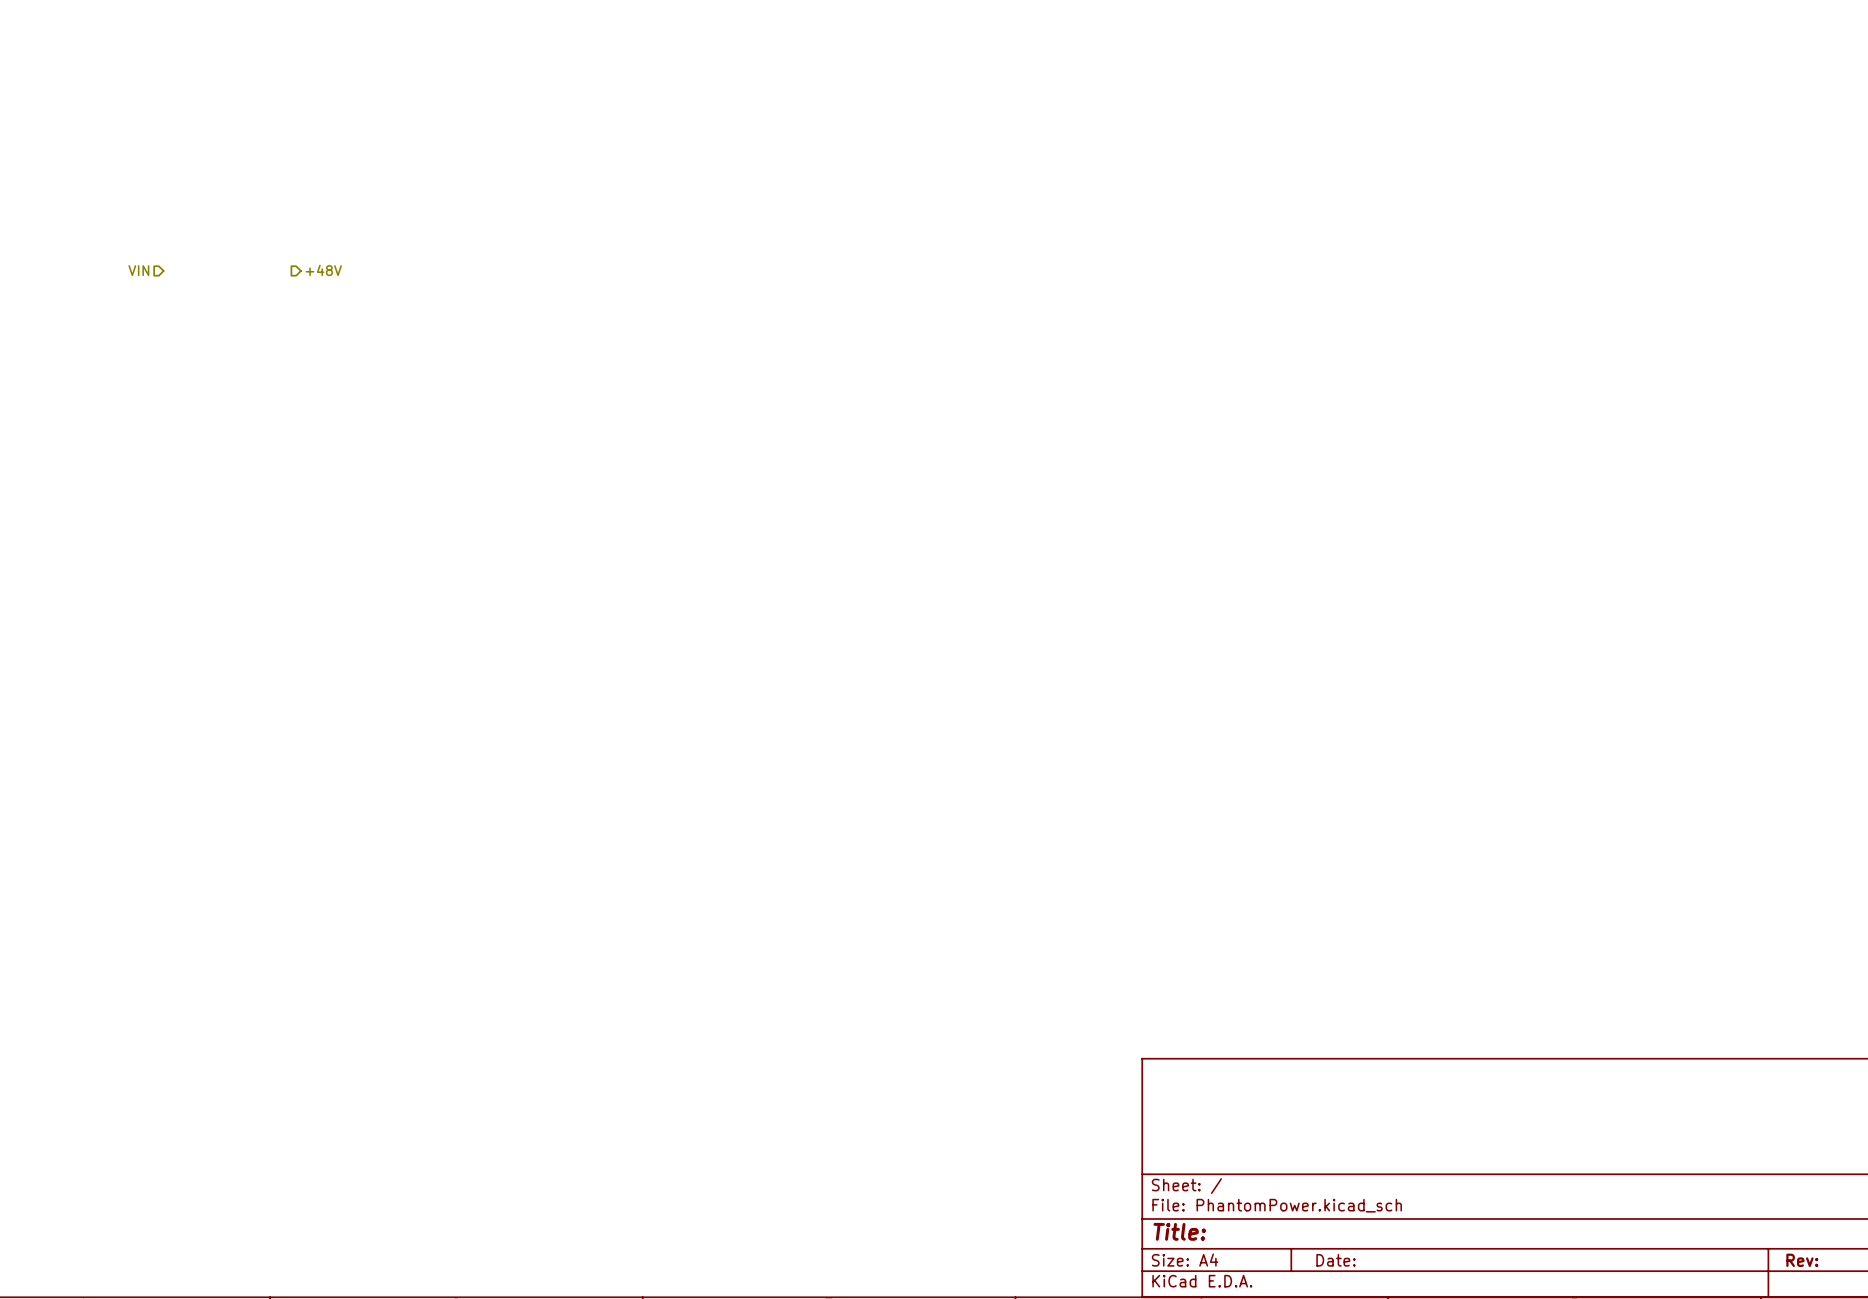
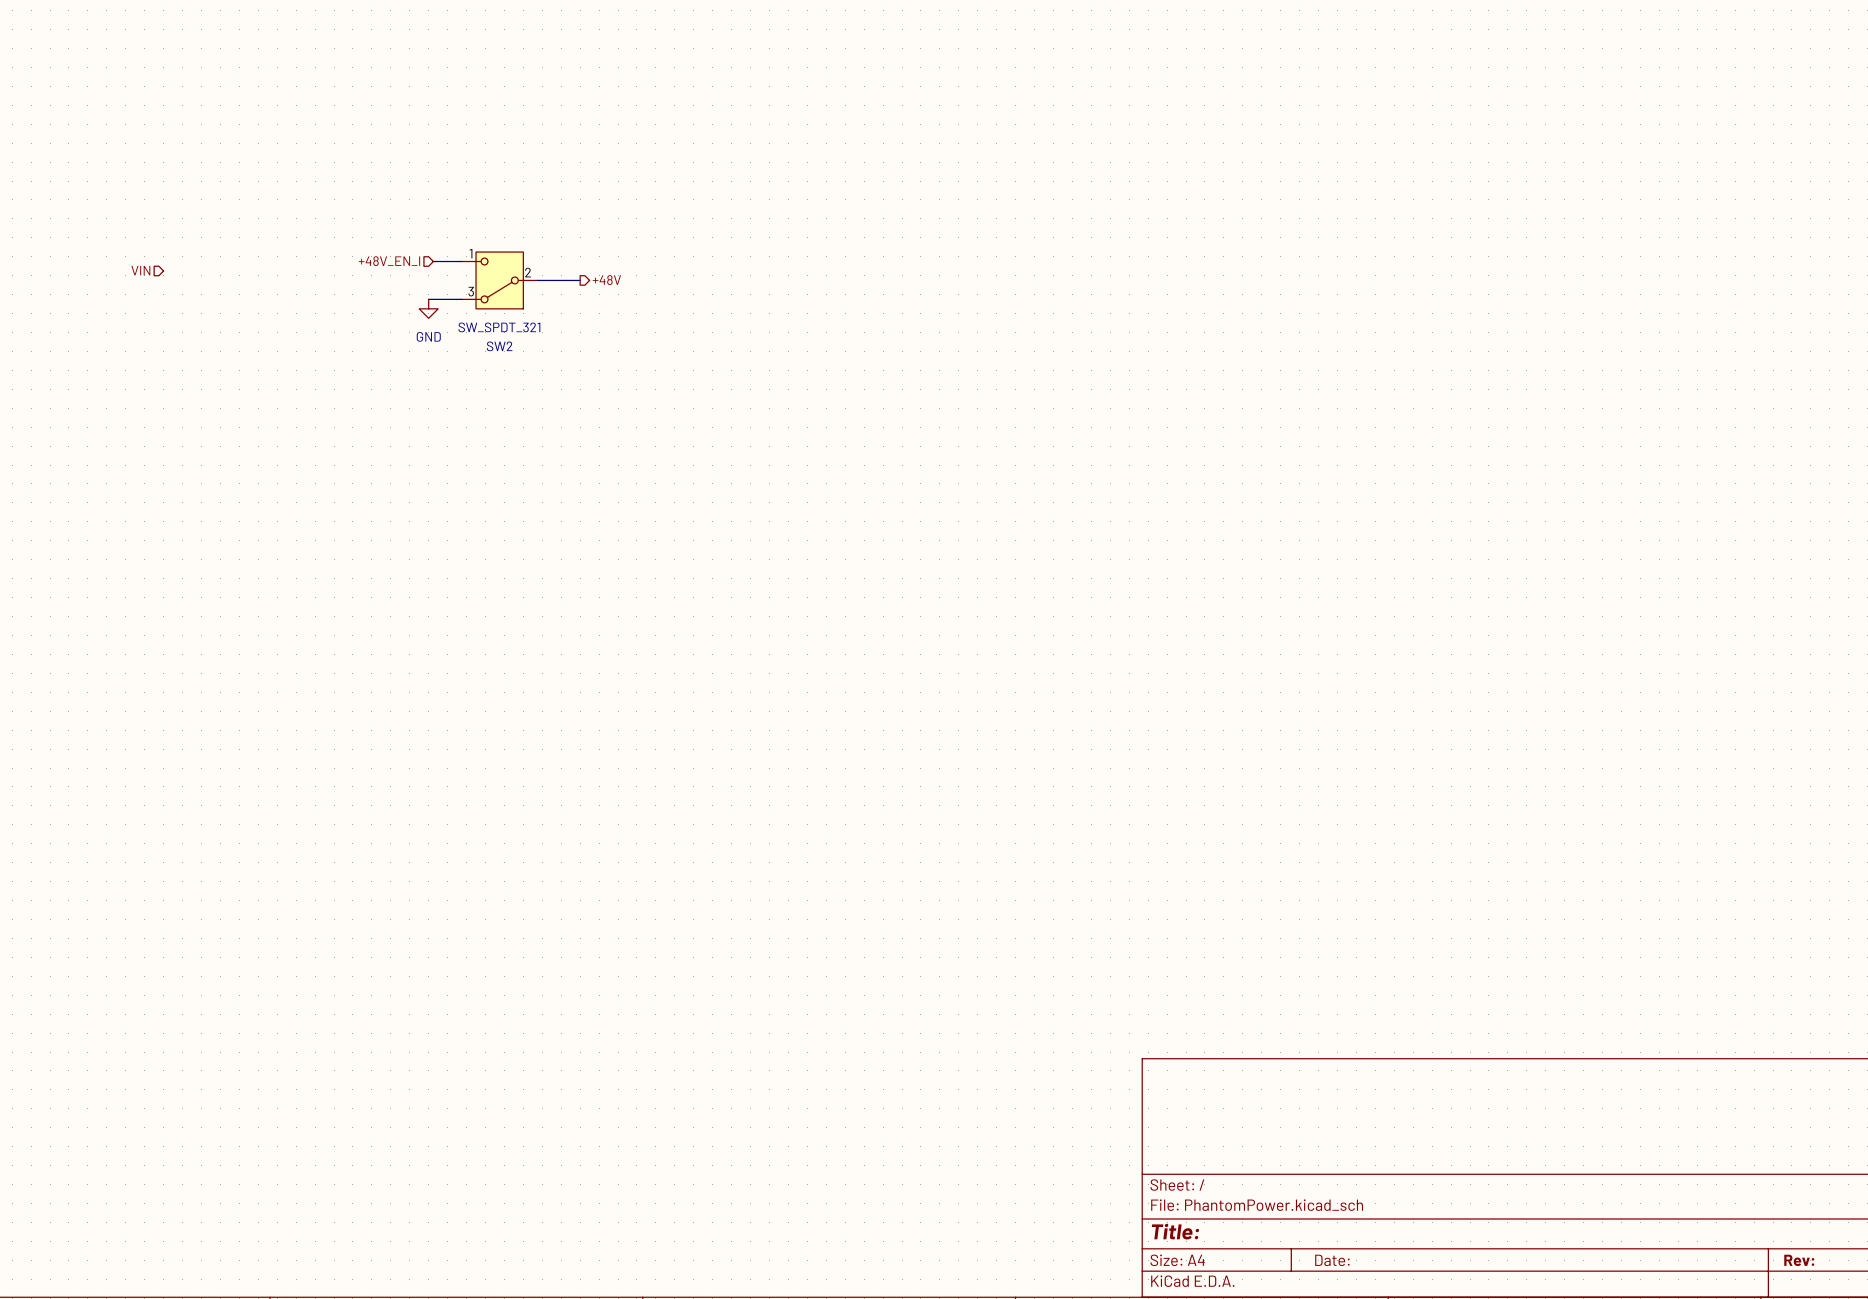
wire: none -> (433, 261) (461, 261)
hierarchical label shape: output (323, 270) -> input (389, 261)
hierarchical label: +48V (323, 270) -> +48V_EN_I (389, 261)
hierarchical label: none -> +48V (606, 280)
SW2: none -> SW_SPDT_321 (499, 280)
wire: none -> (537, 280) (580, 280)
wire: none -> (428, 299) (461, 299)
power symbol: none -> GND (428, 308)

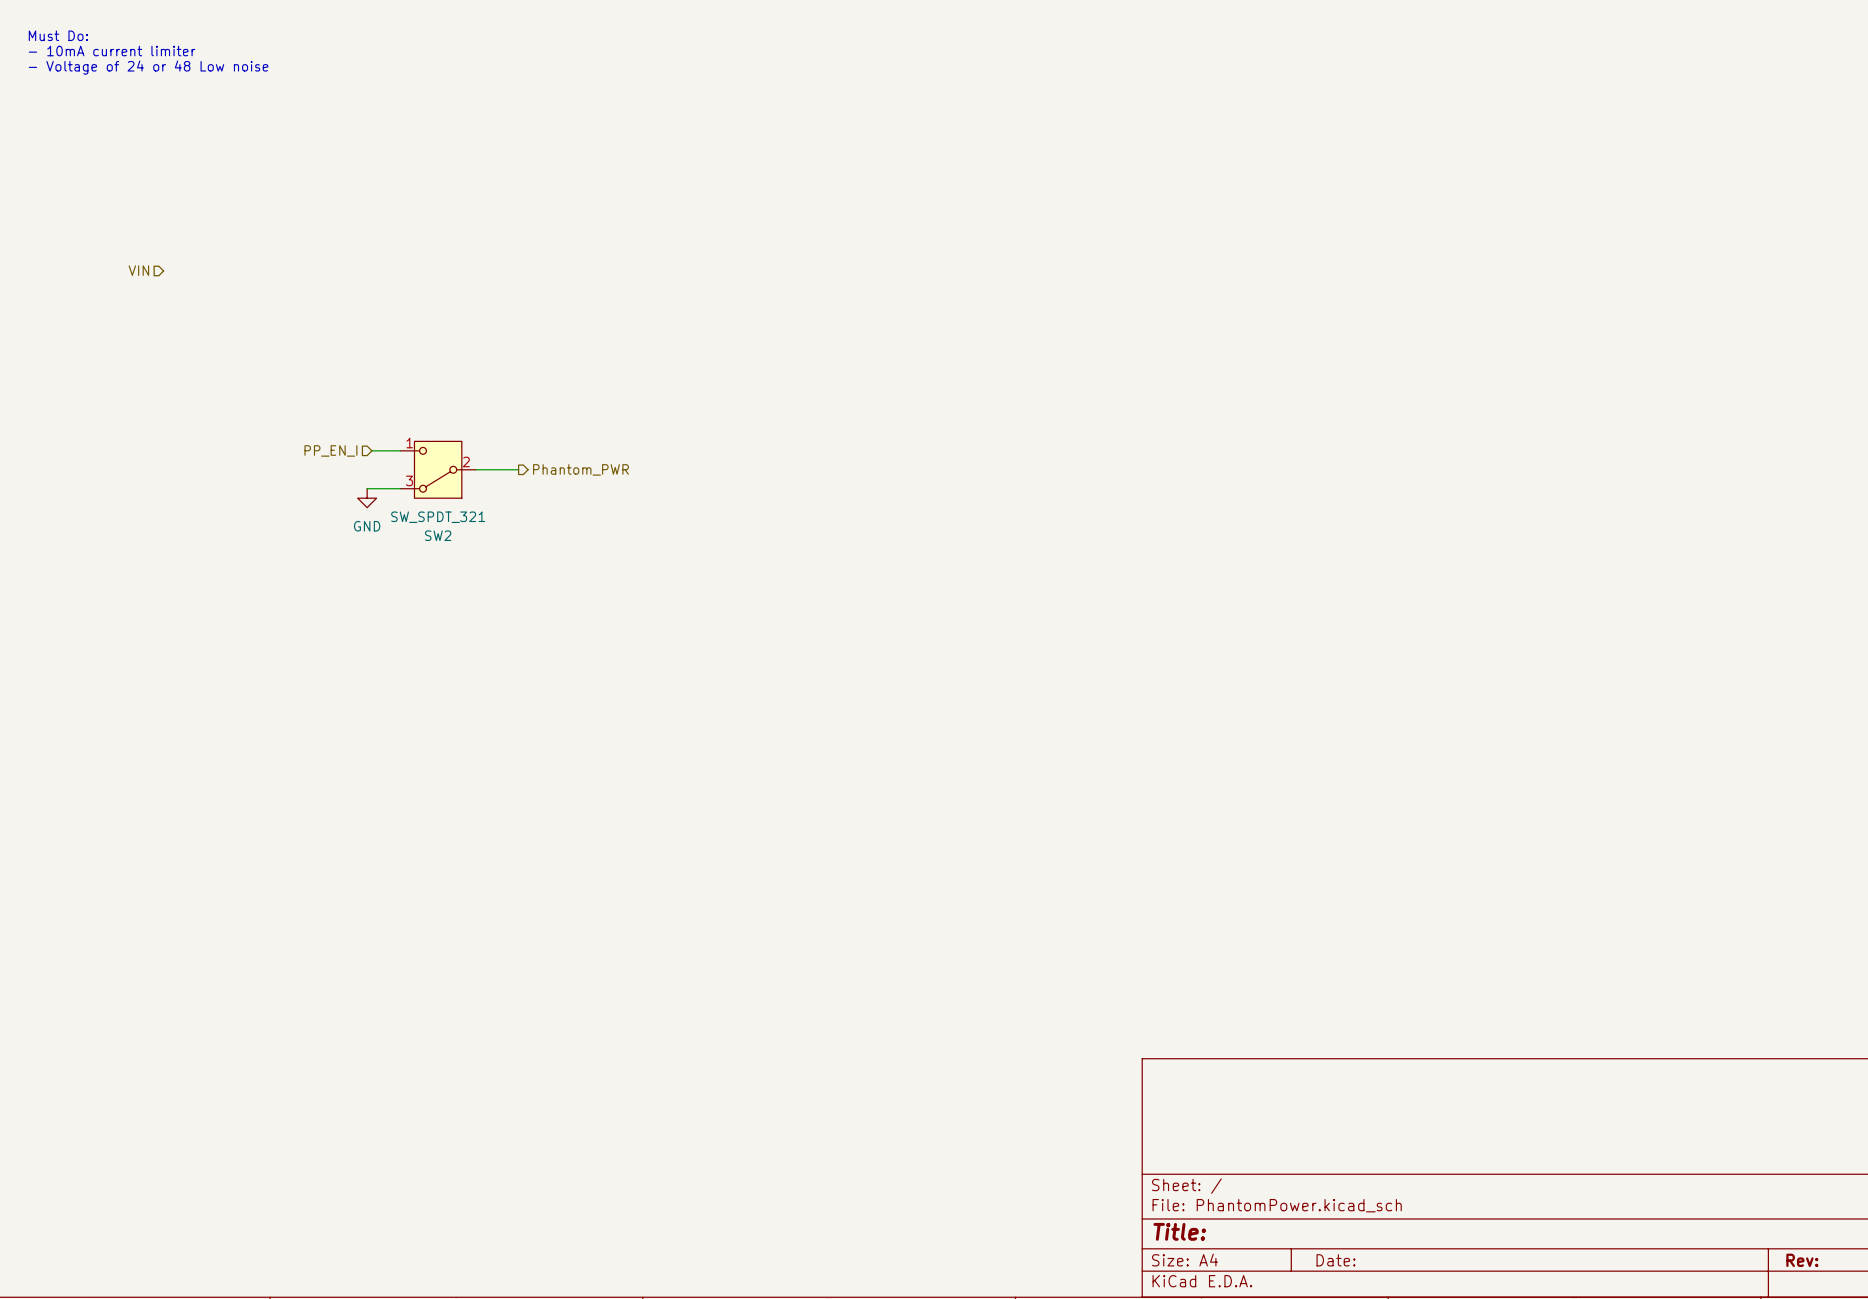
text: none -> Must Do: (58, 35)
text: none -> - 10mA current limiter (112, 51)
text: none -> - Voltage of 24 or 48 Low noise (148, 67)
hierarchical label: +48V_EN_I (389, 261) -> none
wire: (433, 261) (461, 261) -> none
SW2 position: (499, 280) -> (438, 469)
wire: (537, 280) (580, 280) -> none
hierarchical label: +48V (606, 280) -> none
wire: (428, 299) (461, 299) -> none
power symbol: GND (428, 308) -> none
hierarchical label: none -> PP_EN_I (330, 450)
wire: none -> (371, 450) (400, 450)
wire: none -> (476, 469) (518, 469)
hierarchical label: none -> Phantom_PWR (580, 469)
wire: none -> (367, 488) (400, 488)
power symbol: none -> GND (367, 498)

